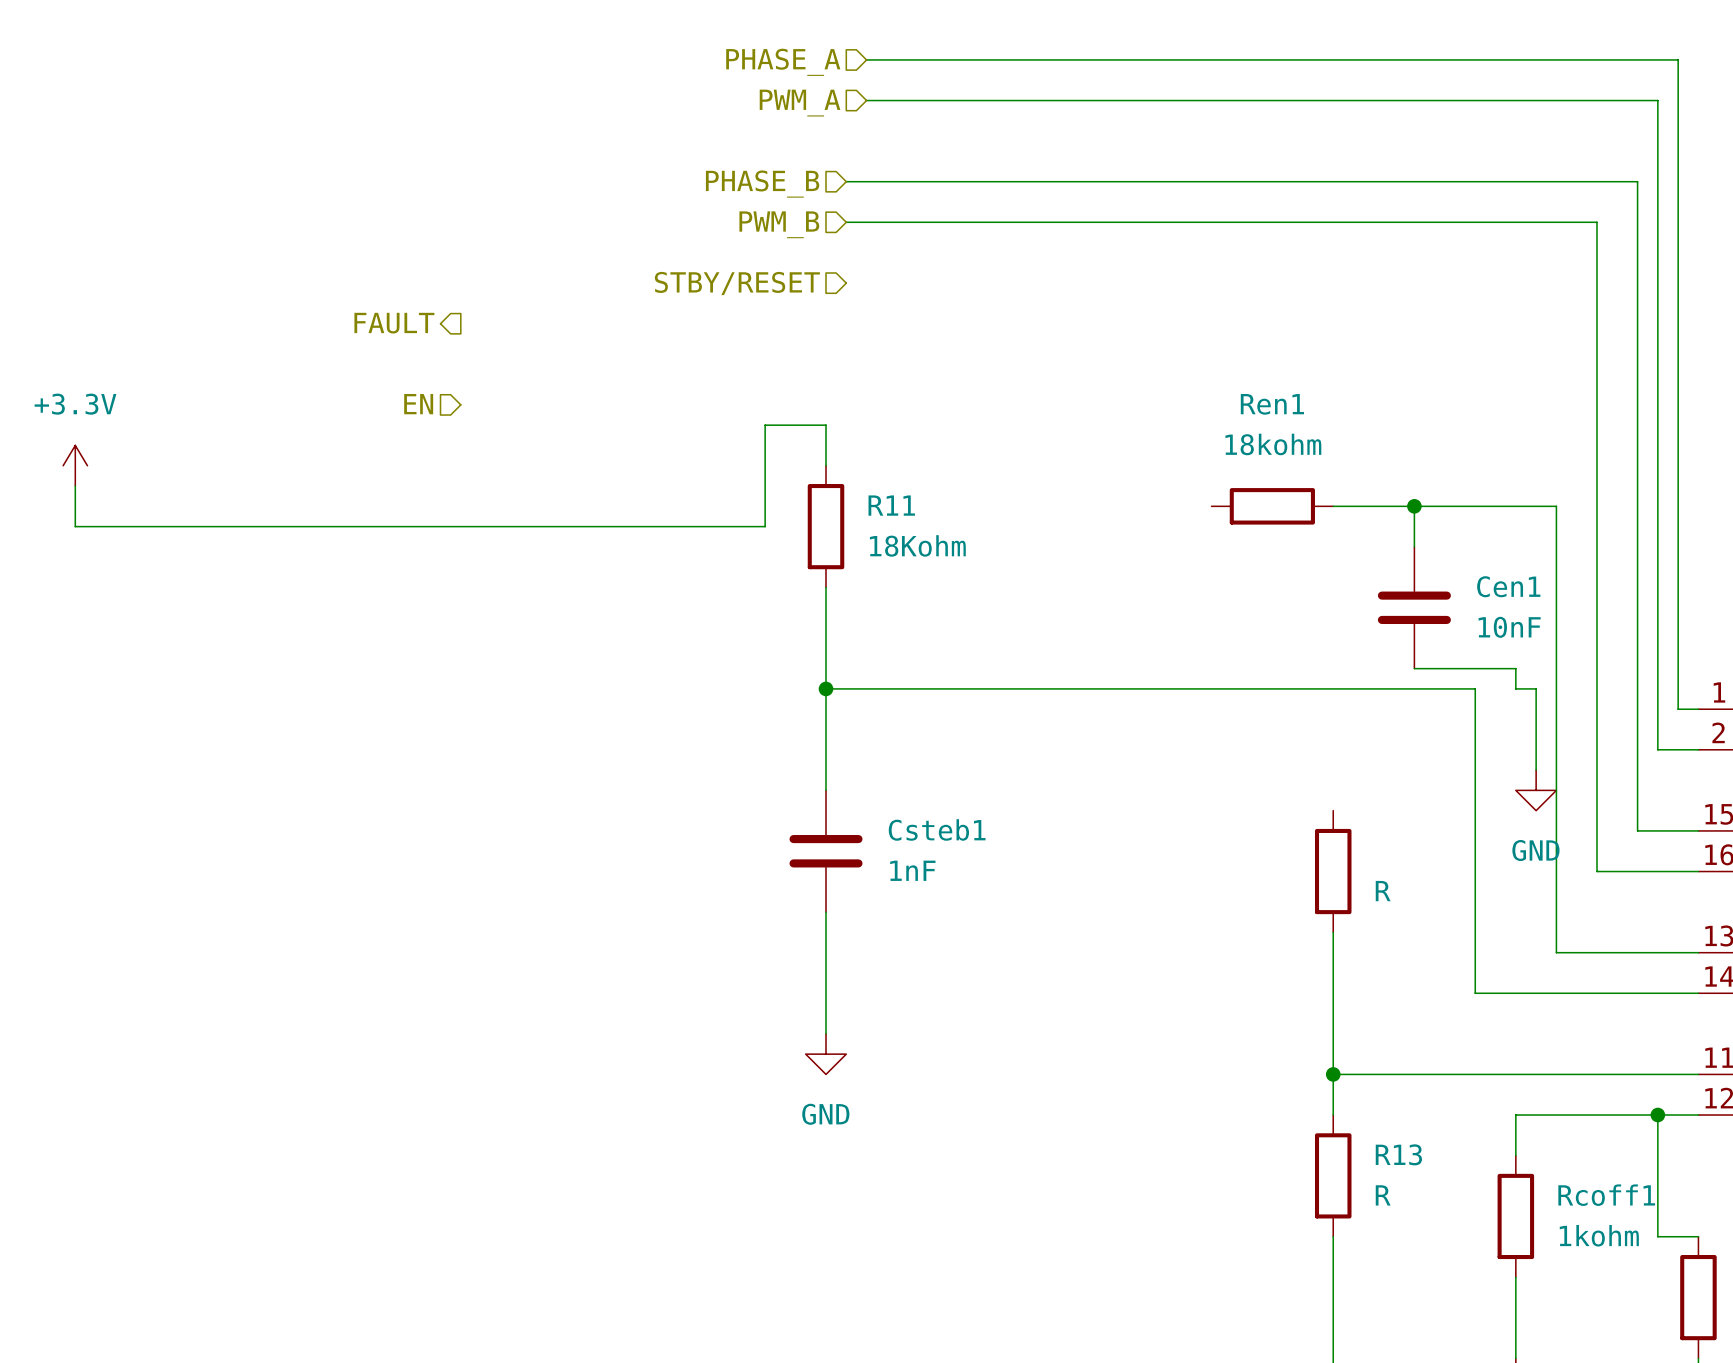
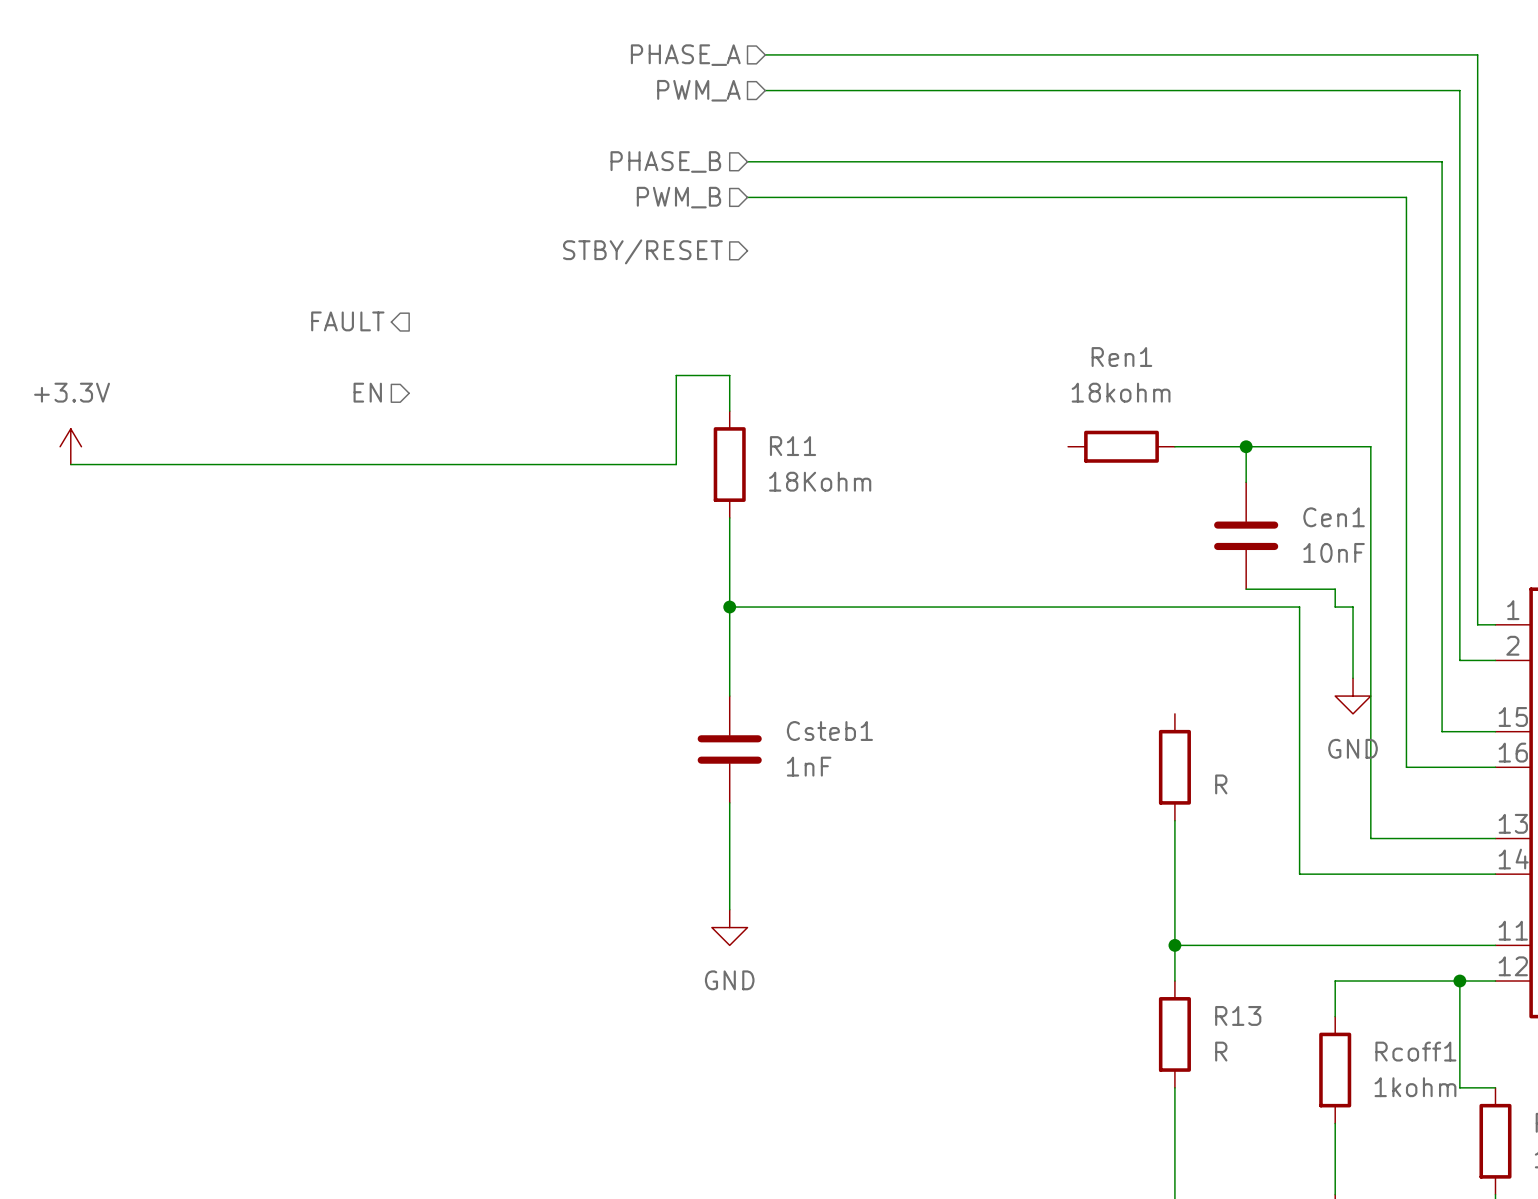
hierarchical label position: FAULT (394, 323) -> FAULT (347, 321)
hierarchical label position: EN (418, 404) -> EN (367, 392)
power symbol position: +3.3V (75, 465) -> +3.3V (70, 446)

